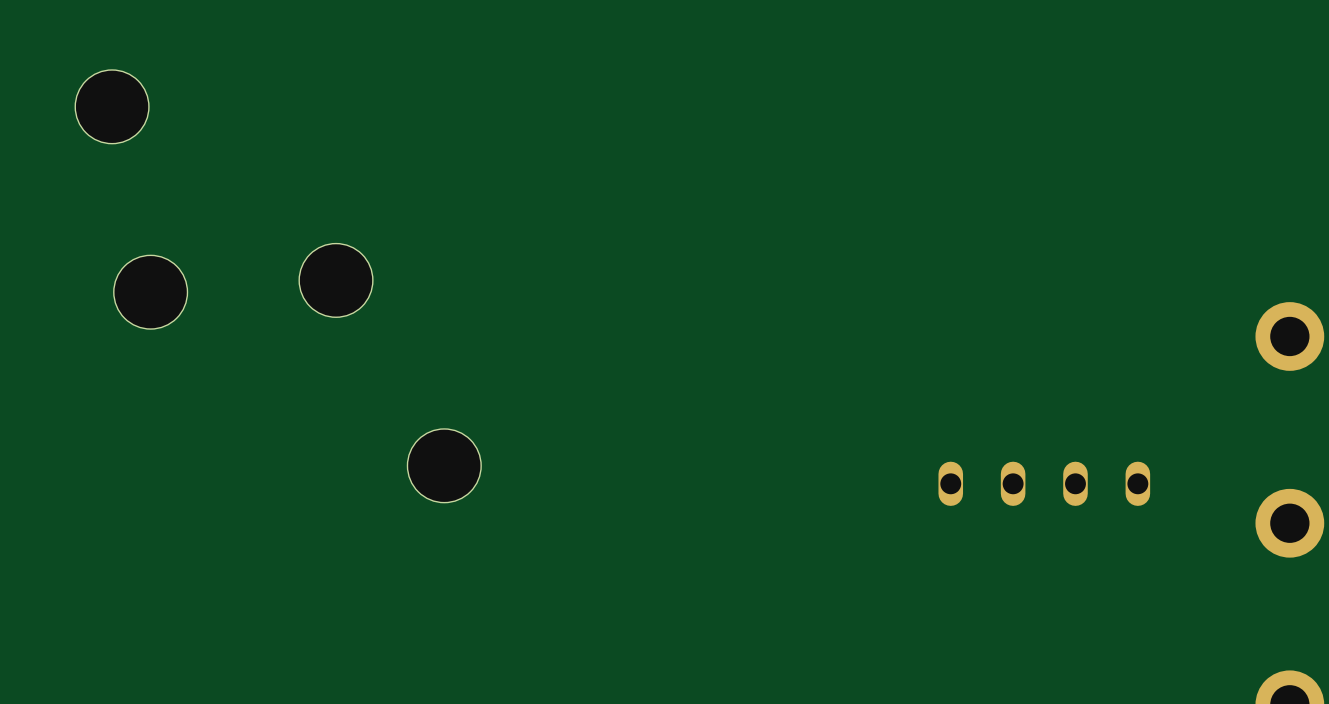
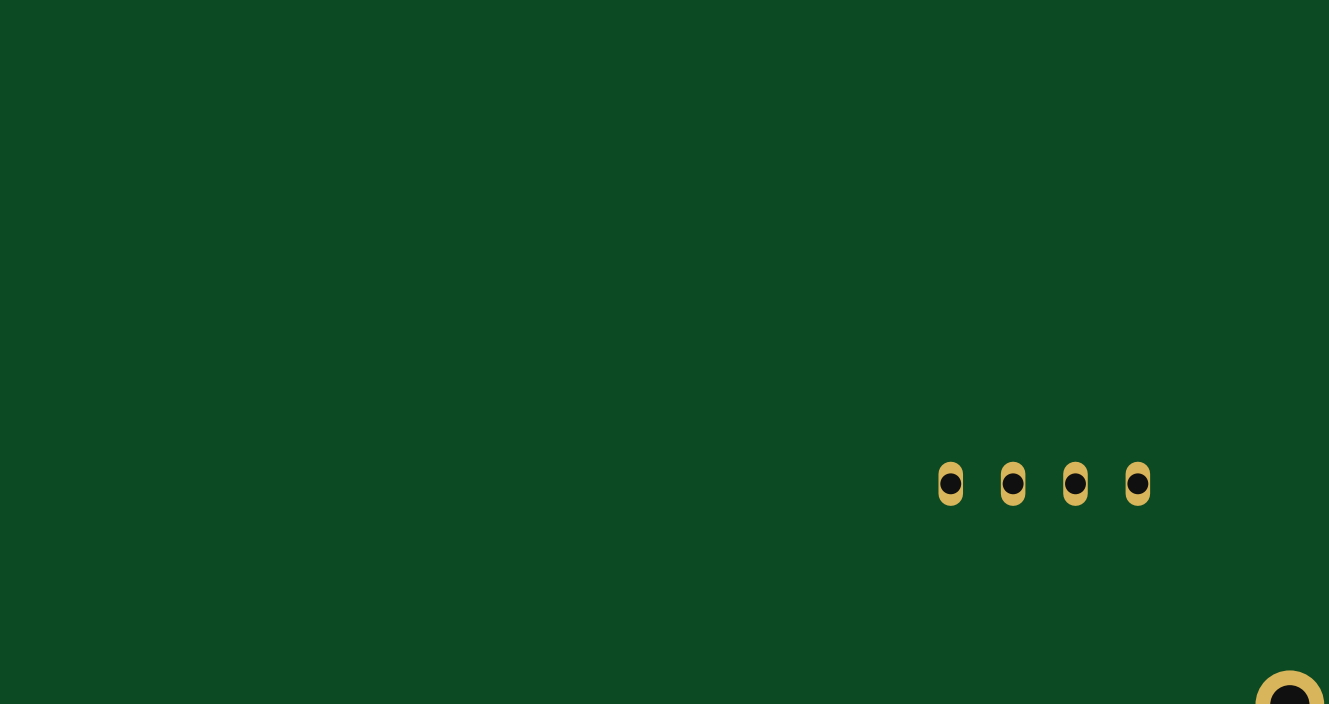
part: (112, 106) -> none
part: (336, 280) -> none
part: (150, 292) -> none
part: (1289, 336) -> none
part: (444, 465) -> none
part: (1289, 523) -> none

